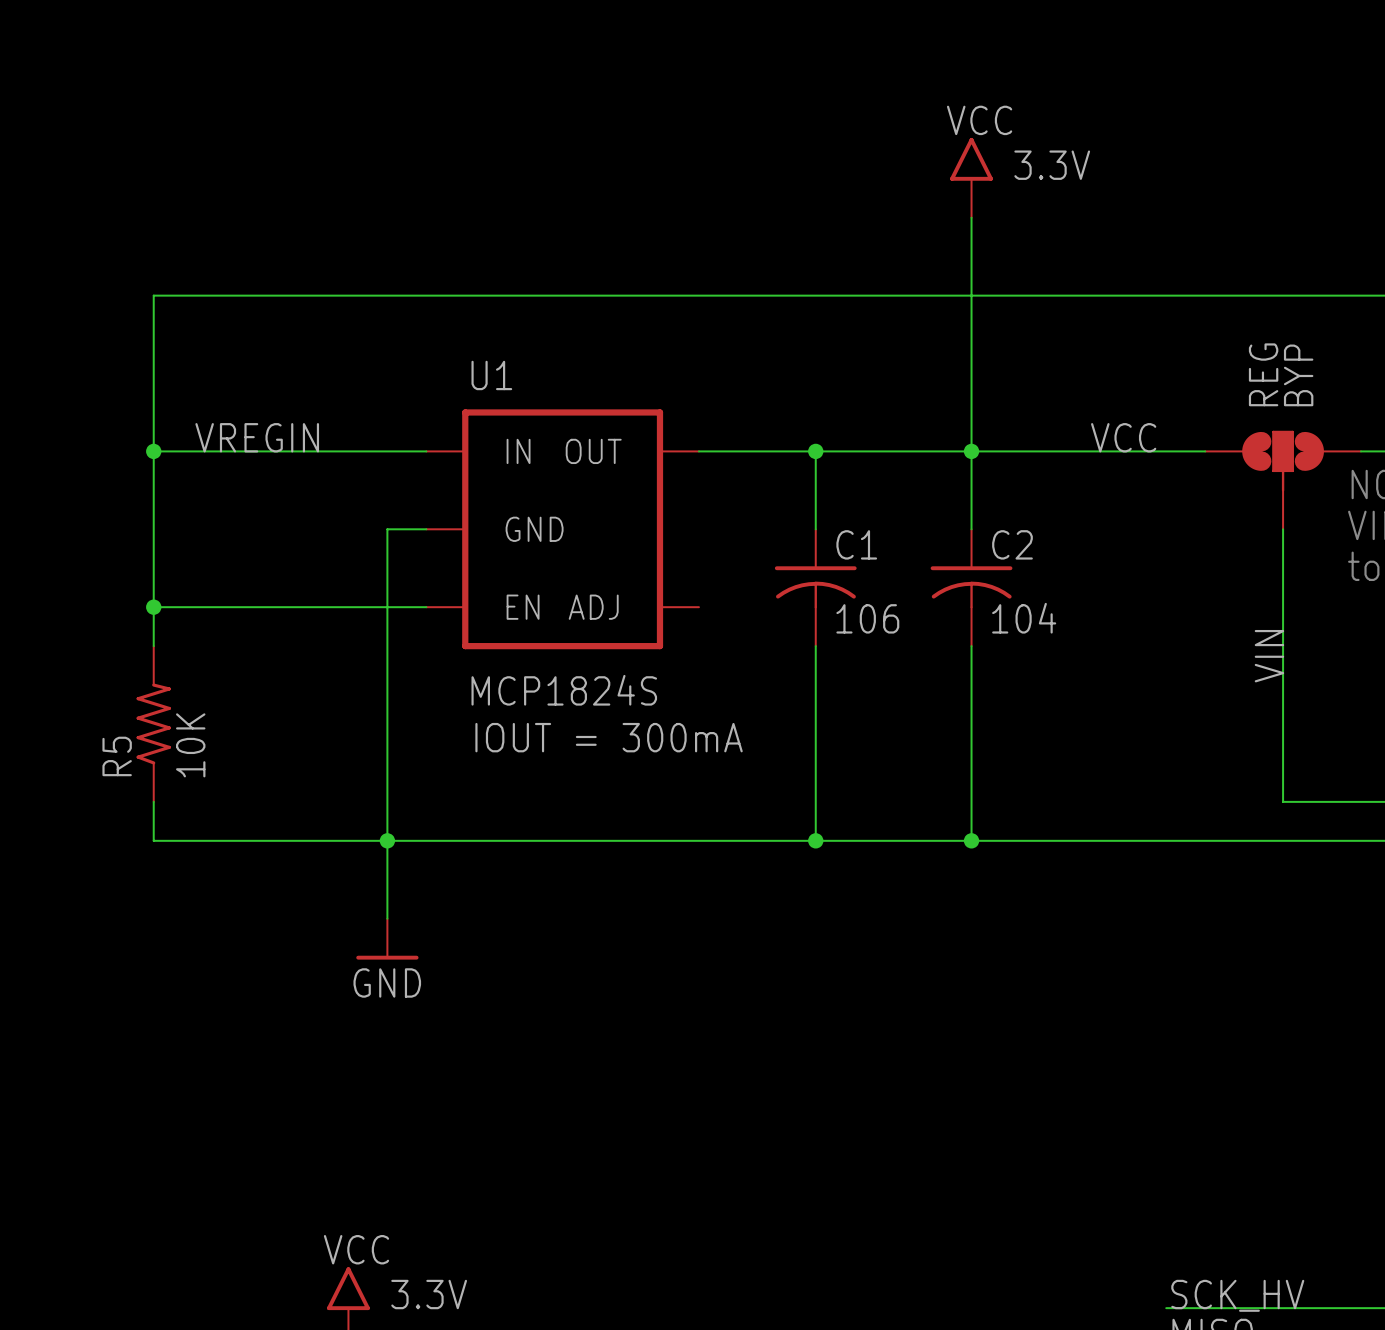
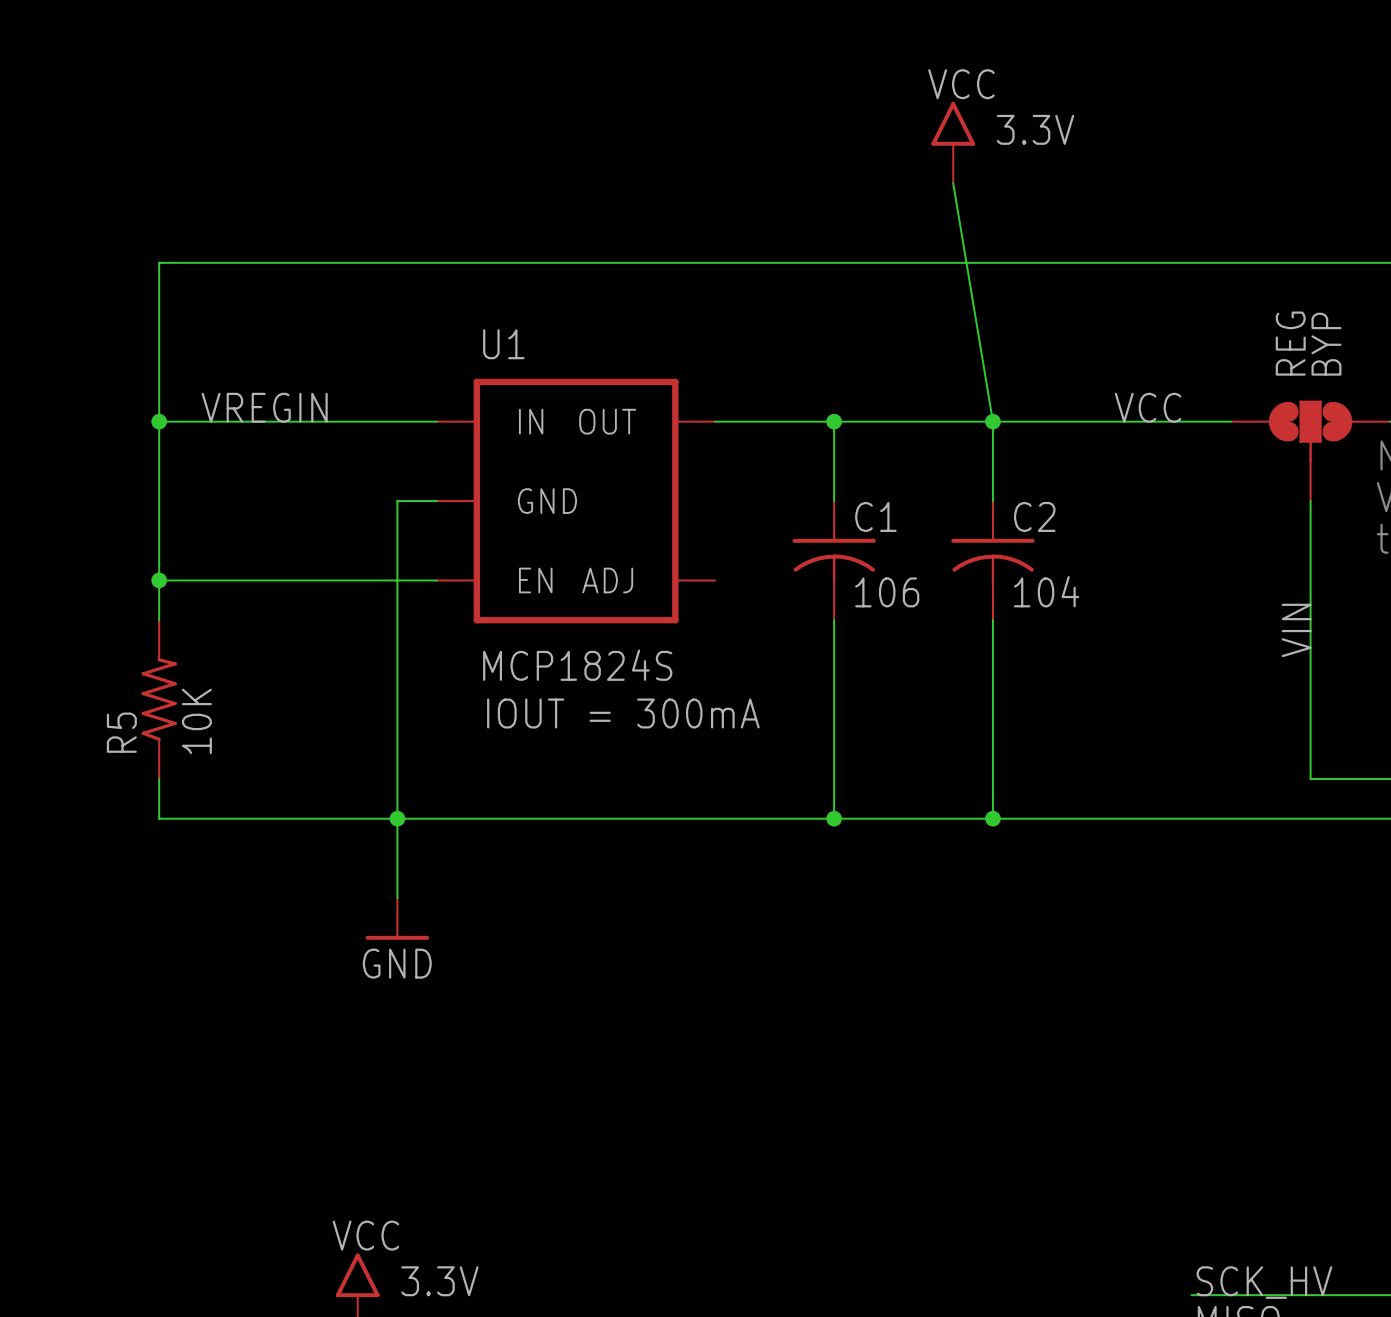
power symbol position: 3.3V (971, 177) -> 3.3V (953, 142)
wire: (971, 217) (971, 451) -> (953, 183) (992, 421)

